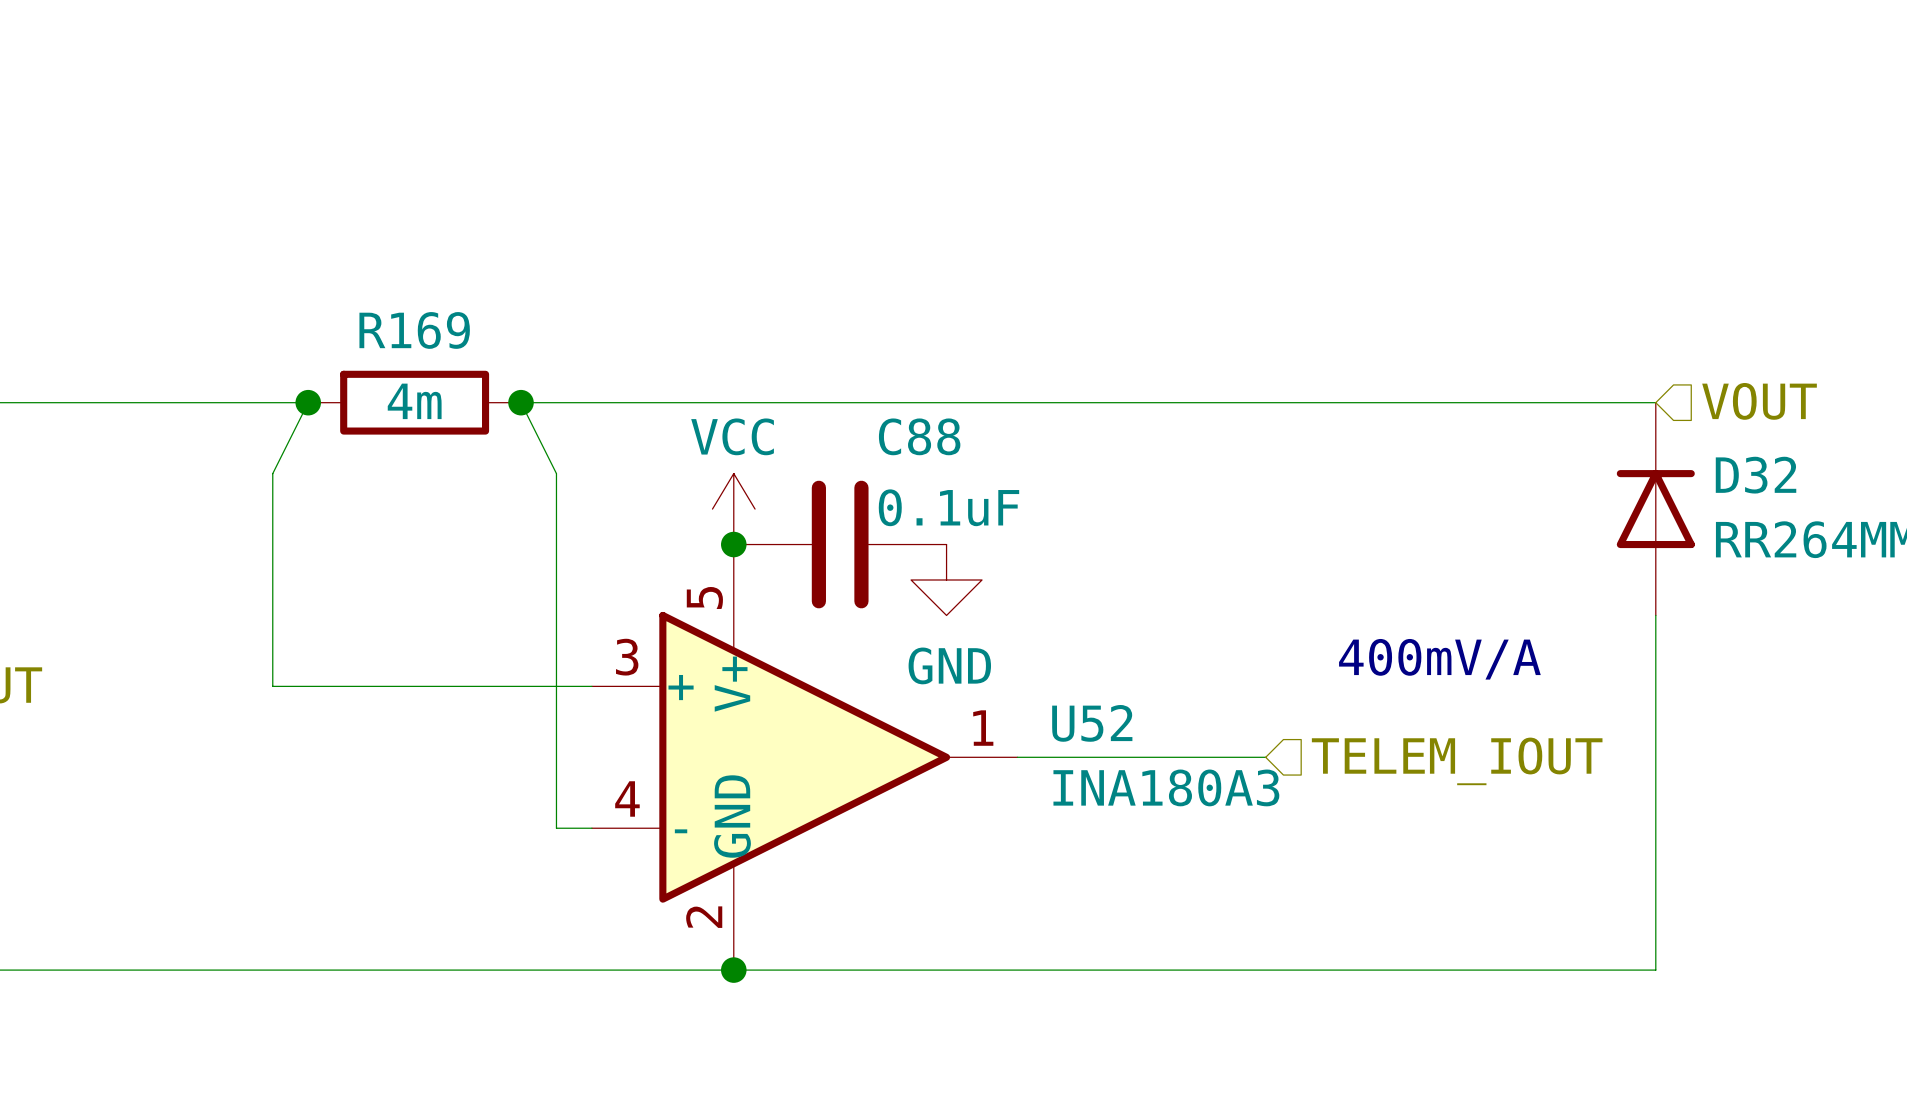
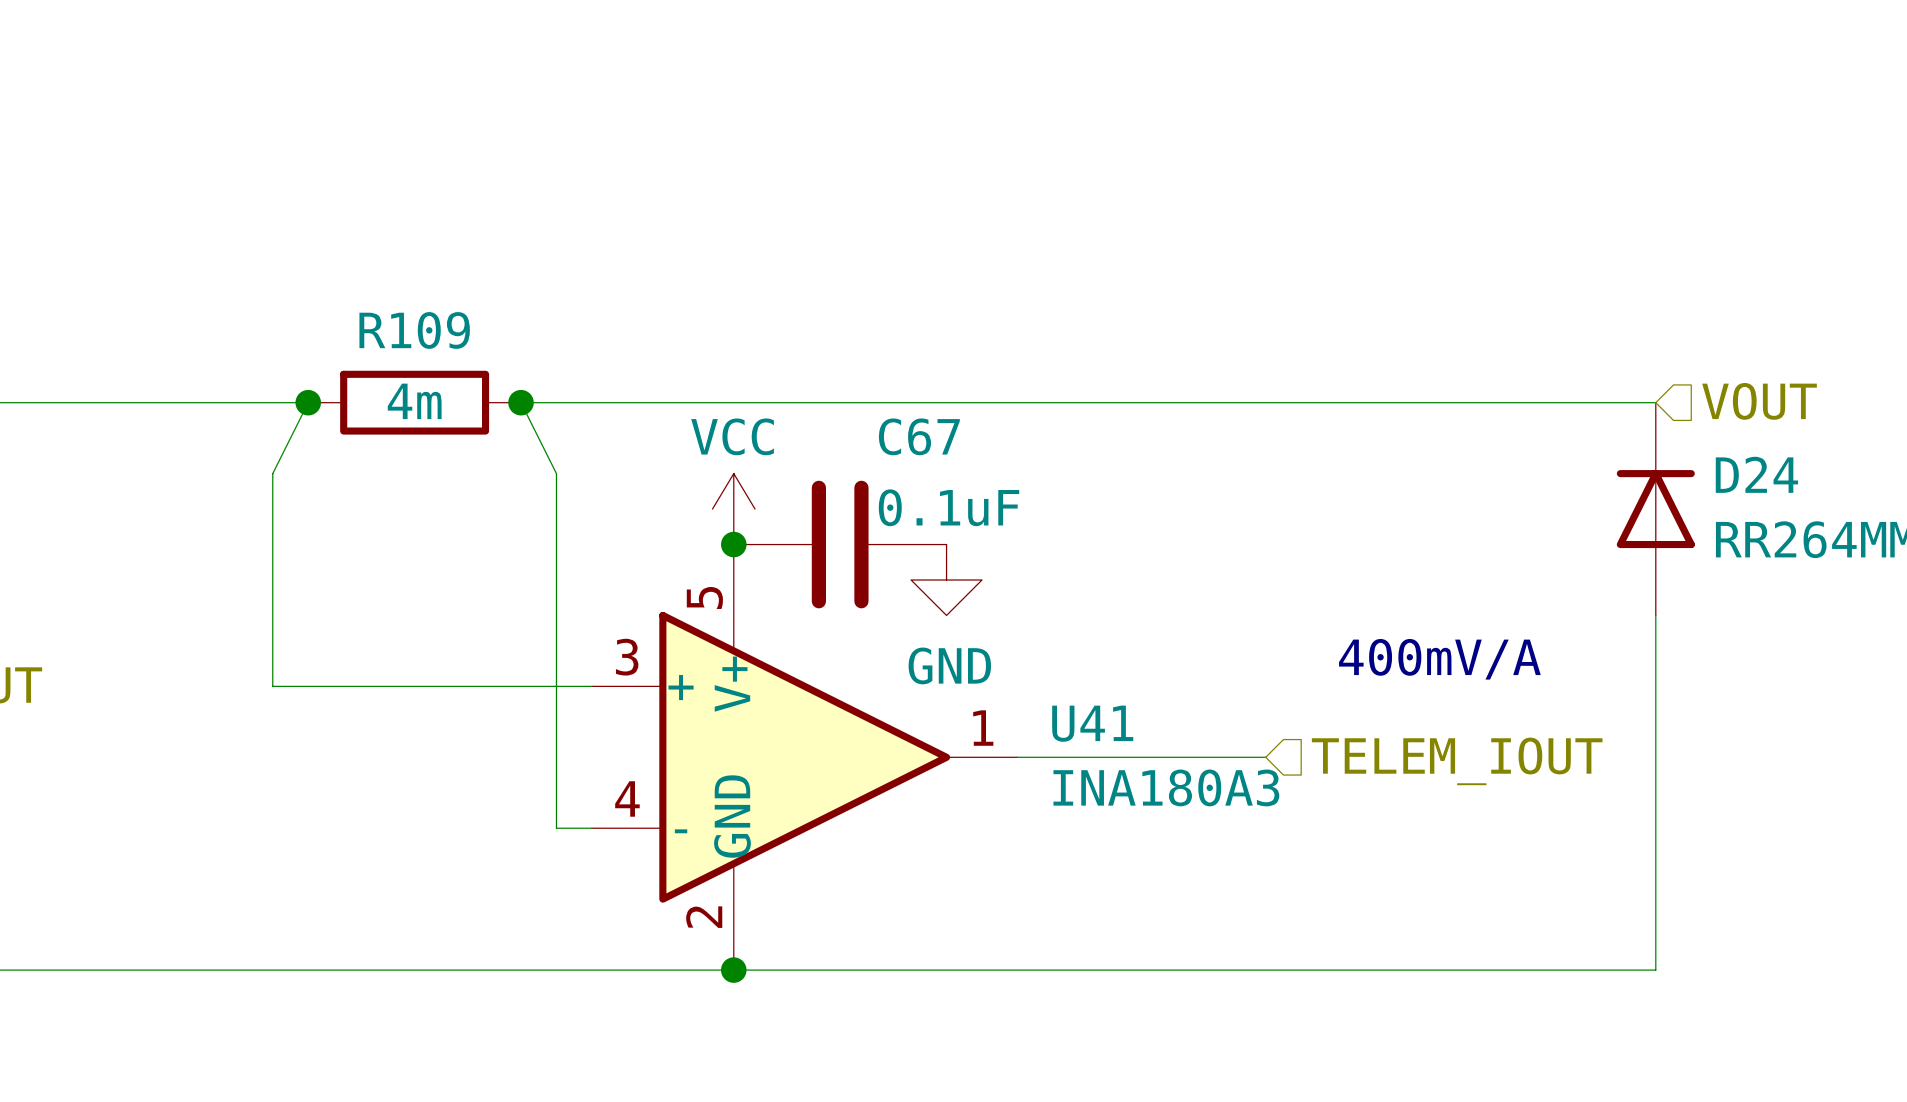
R169 name: R169 (414, 330) -> R109 (414, 330)
C88 name: C88 (919, 436) -> C67 (919, 436)
D32 name: D32 (1756, 475) -> D24 (1756, 474)
U52 name: U52 (1092, 723) -> U41 (1092, 723)

